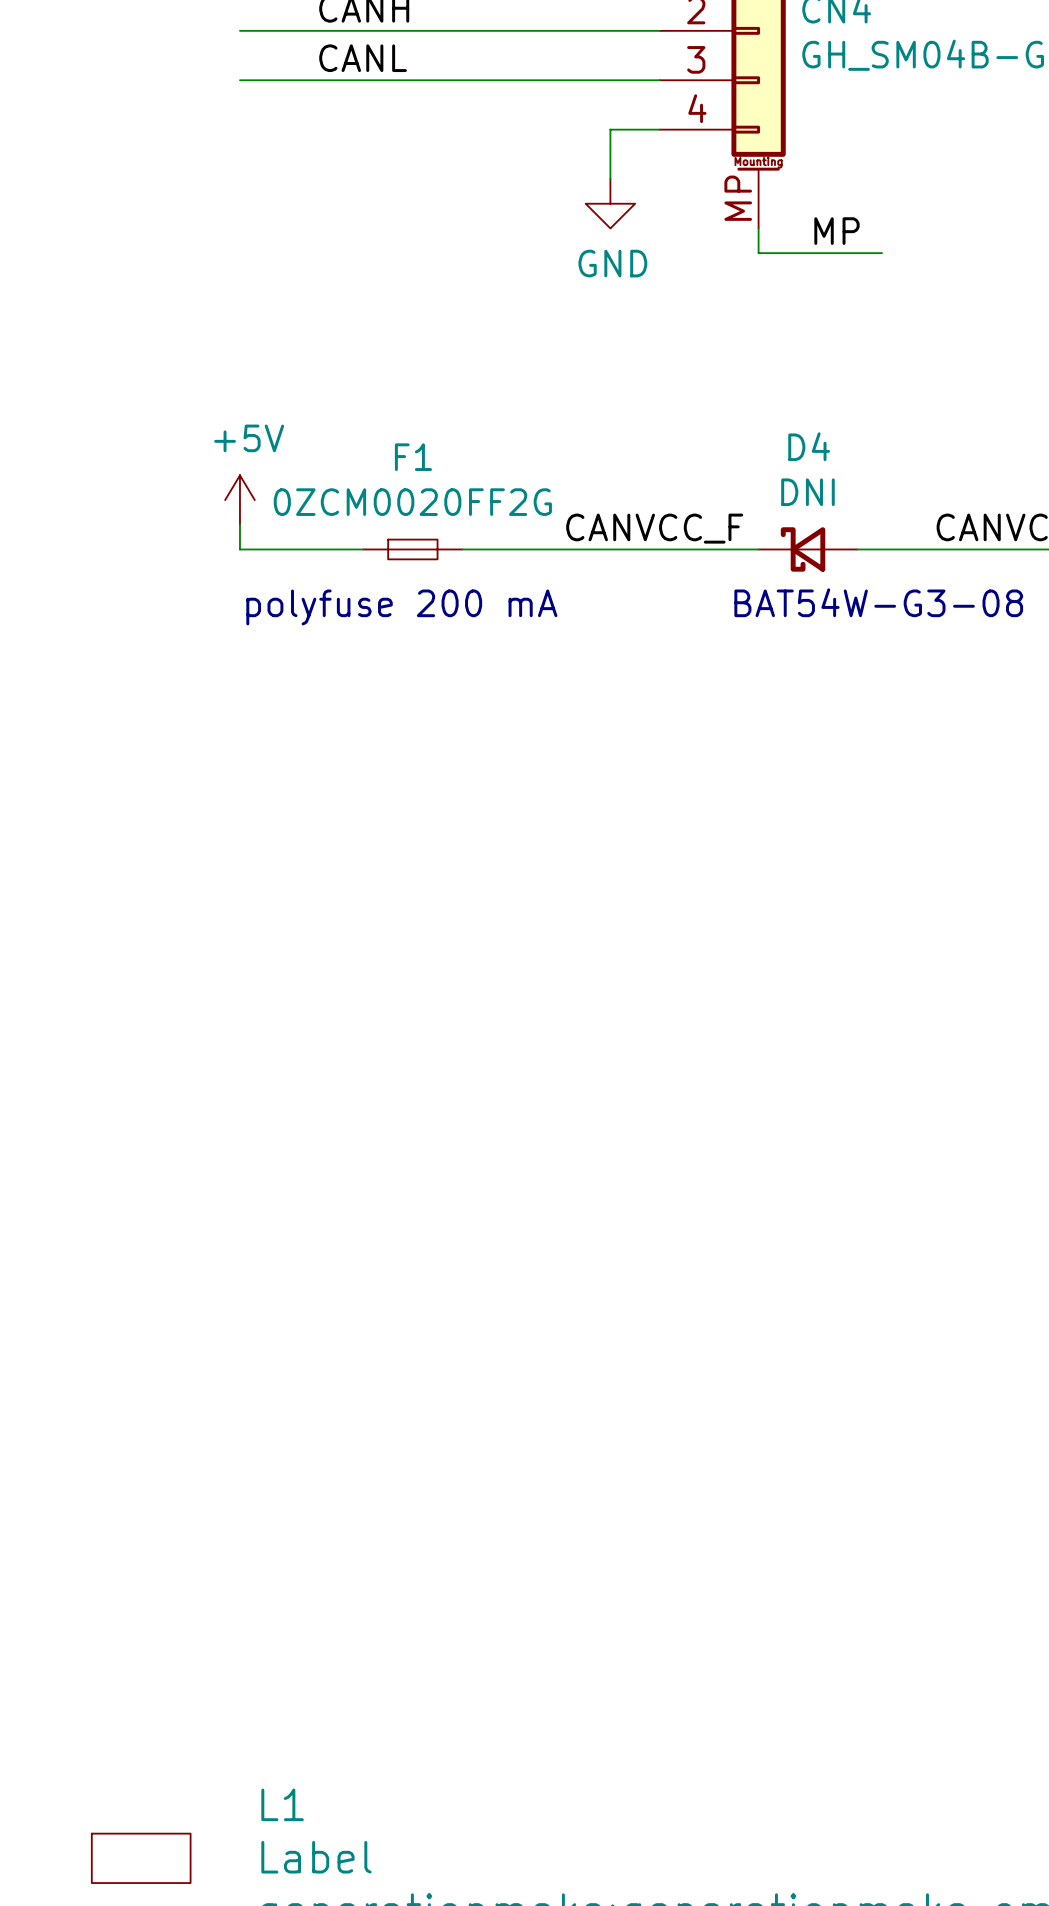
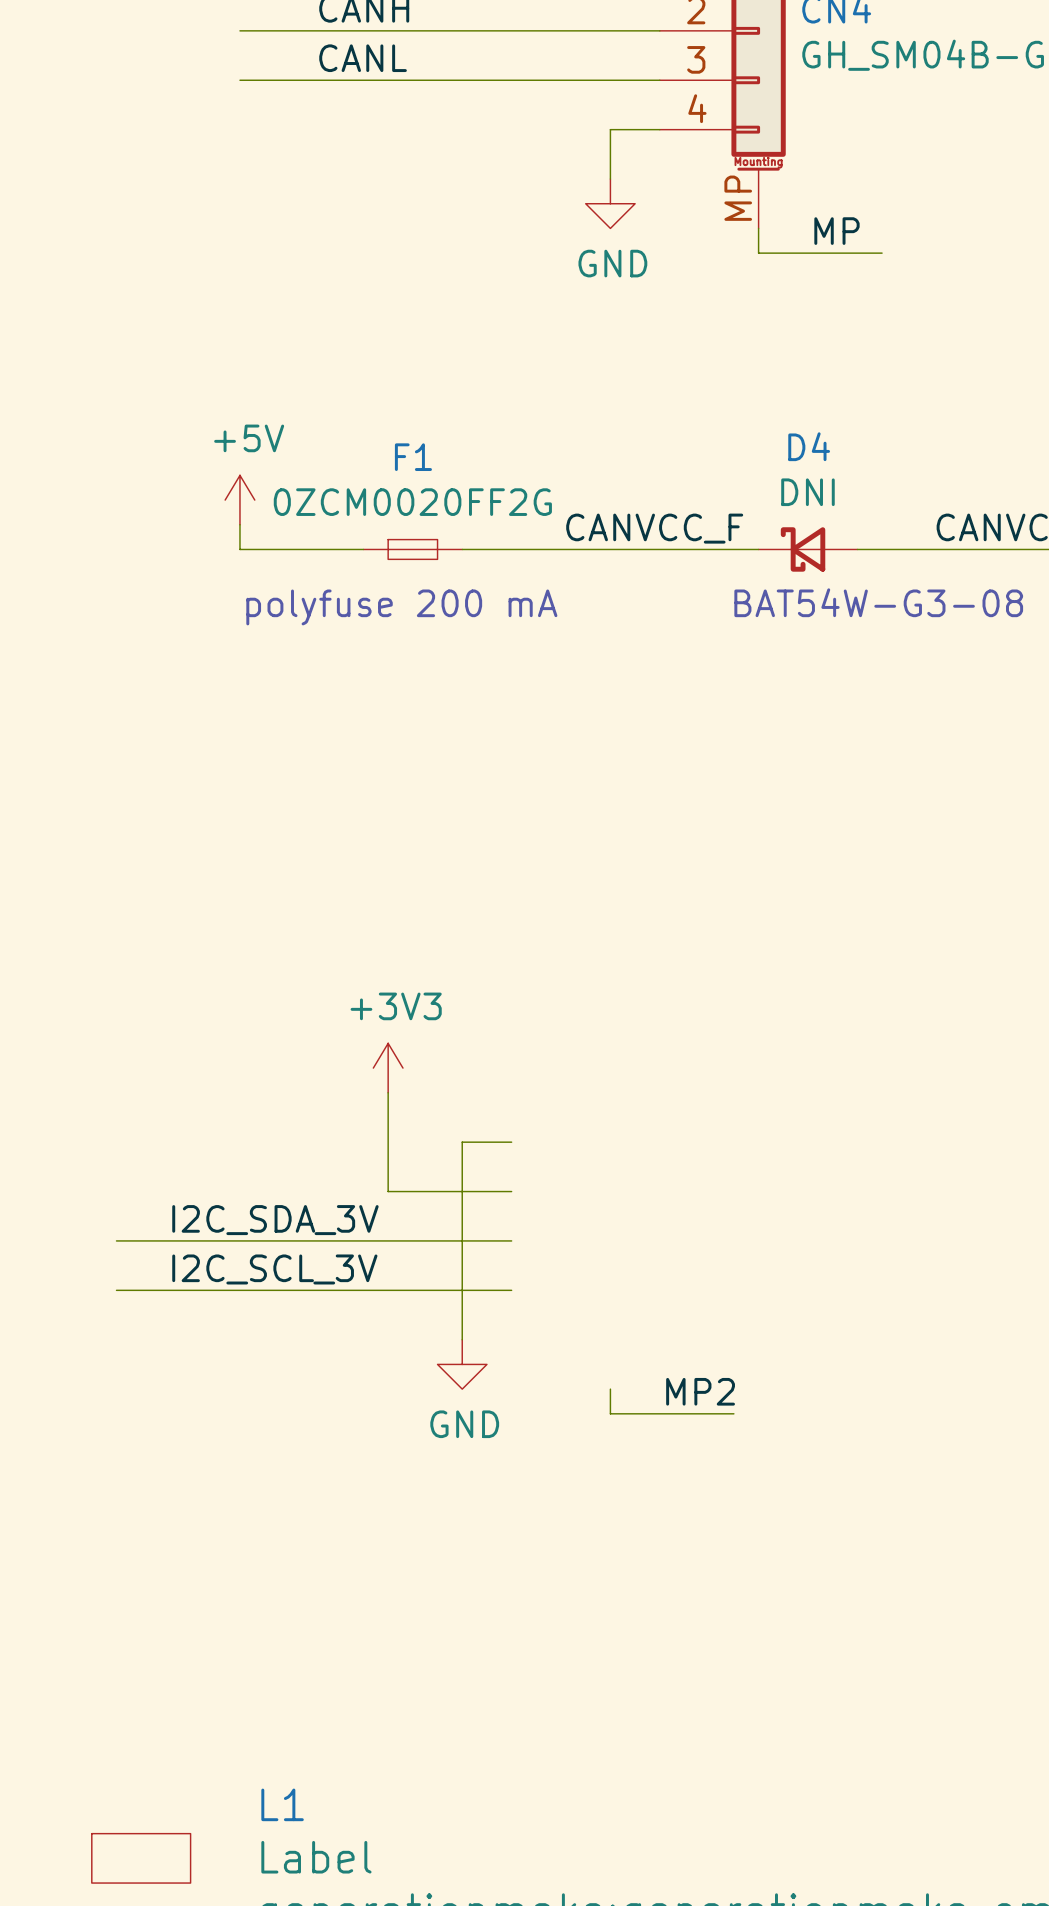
power symbol: none -> +3V3 (388, 1068)
wire: none -> (388, 1092) (388, 1191) (511, 1191)
wire: none -> (511, 1142) (462, 1142) (462, 1339)
label: none -> I2C_SDA_3V (275, 1220)
wire: none -> (116, 1240) (511, 1240)
label: none -> I2C_SCL_3V (274, 1269)
wire: none -> (116, 1290) (511, 1290)
power symbol: none -> GND (462, 1364)
wire: none -> (610, 1389) (610, 1413) (733, 1413)
label: none -> MP2 (700, 1391)

